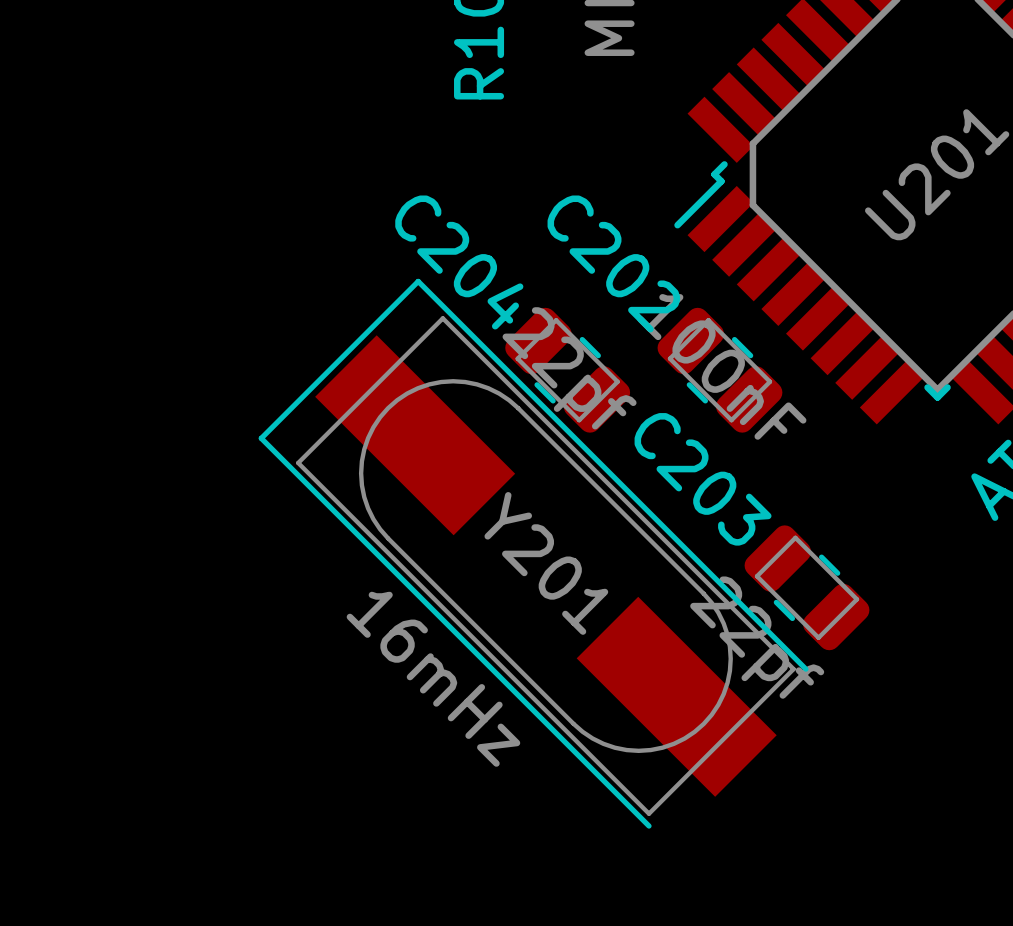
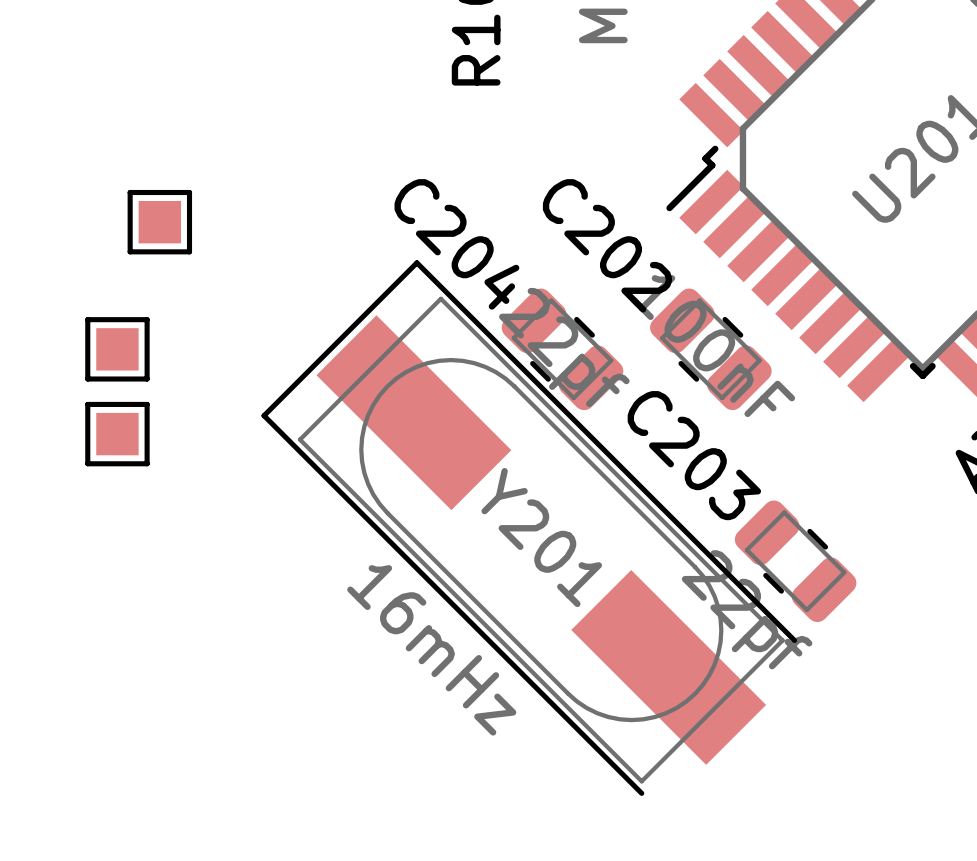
part: none -> (159, 222)
part: none -> (117, 349)
part: none -> (117, 434)

